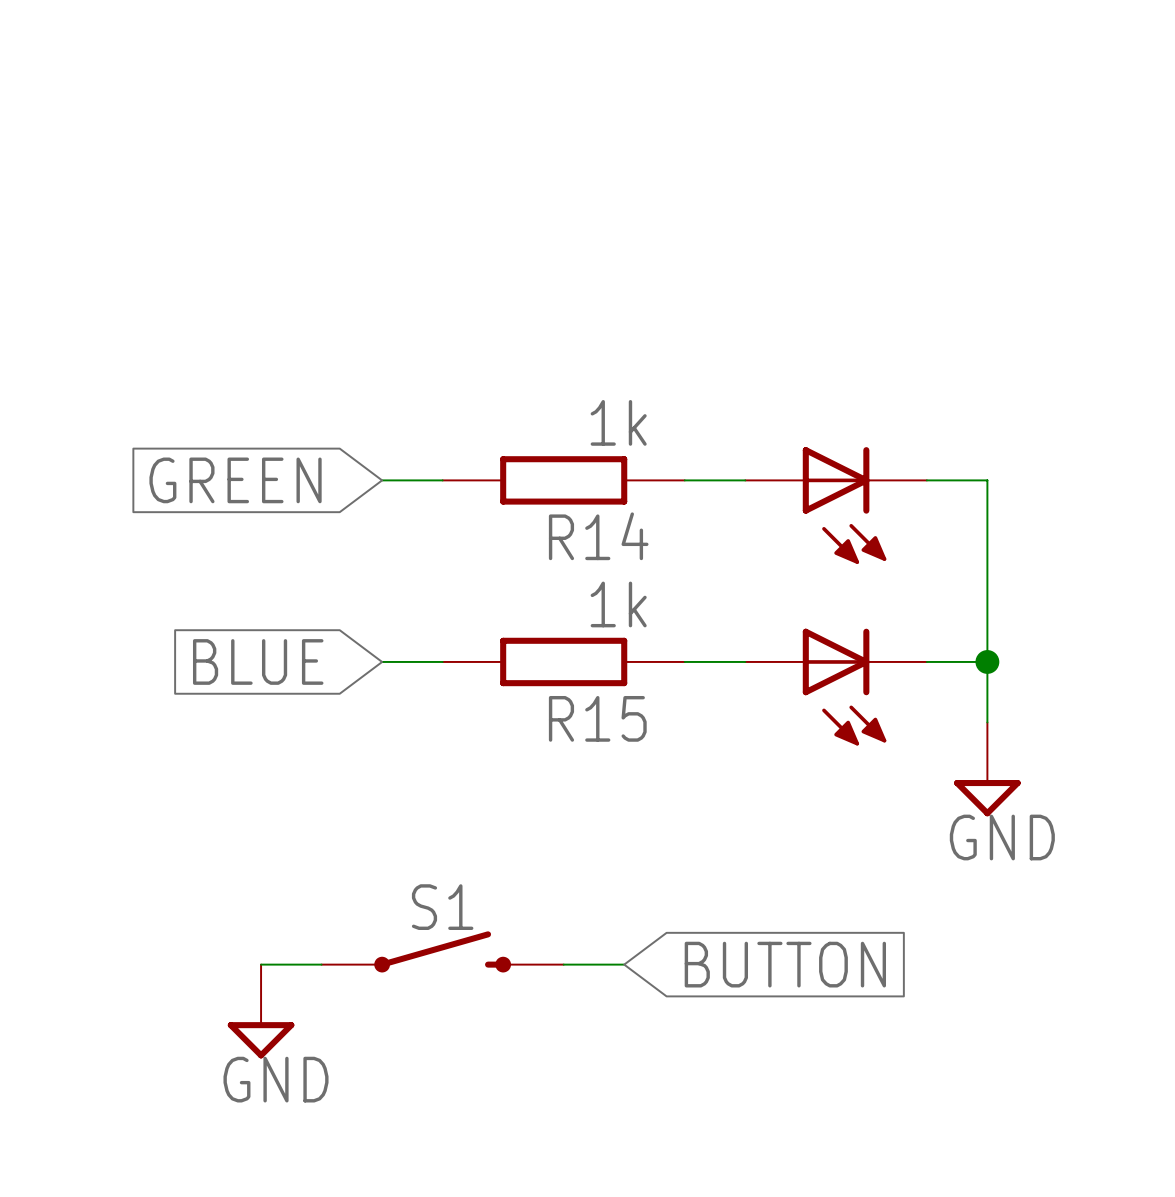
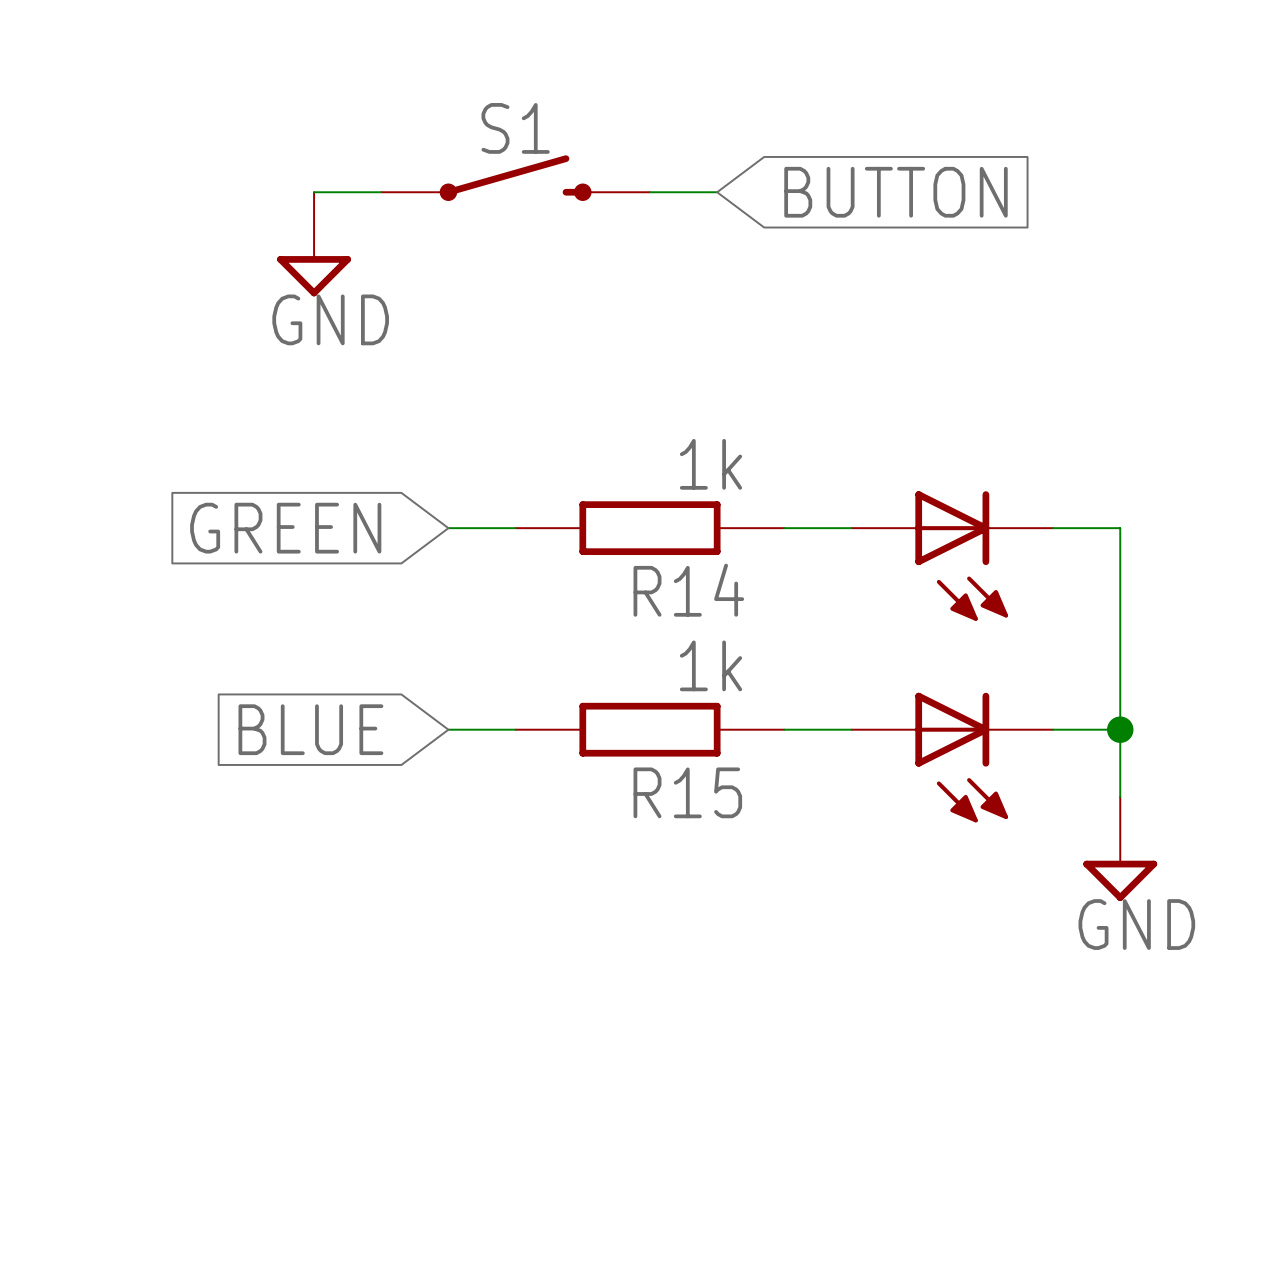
wire: none -> (314, 192) (381, 192)
wire: none -> (649, 192) (717, 192)
global label: none -> BUTTON (895, 192)
power symbol: none -> GND (314, 244)
S1 position: (442, 951) -> (515, 178)
wire: (261, 964) (321, 964) -> none
wire: (563, 964) (624, 964) -> none
global label: BUTTON (785, 964) -> none
power symbol: GND (261, 1011) -> none

